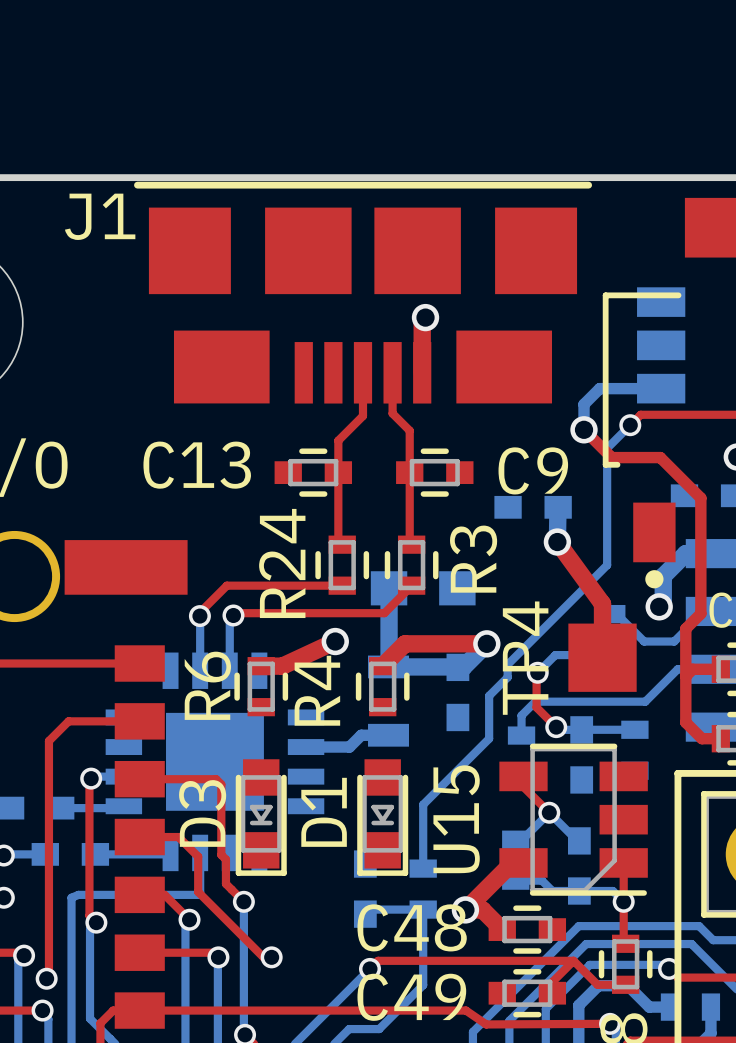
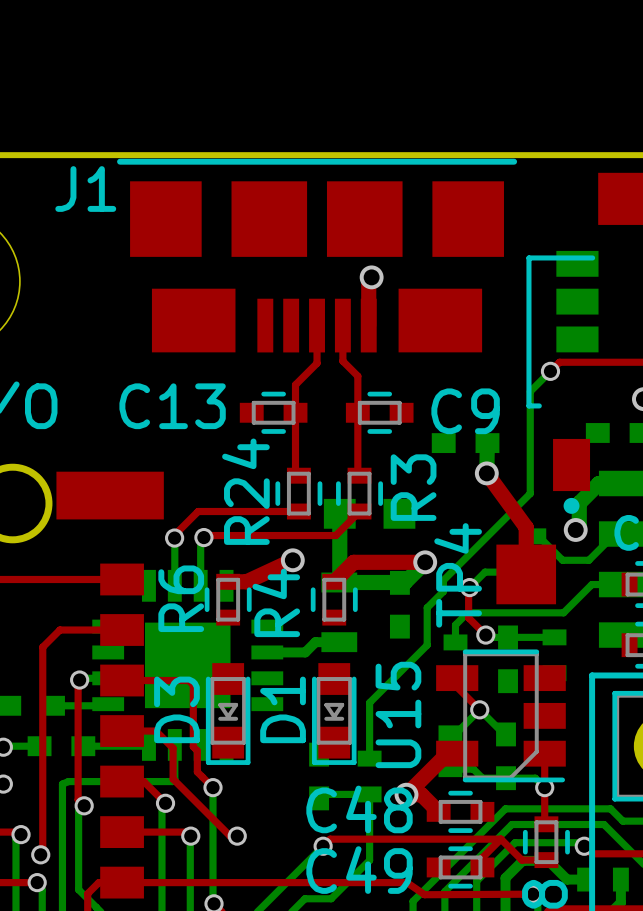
bottom track: (661, 388) (599, 388) (584, 404) (584, 429) -> none
top track: (584, 429) (611, 457) (660, 457) (700, 498) (700, 613) (685, 628) (685, 722) (702, 738) (720, 738) -> none
via: (584, 429) -> none
top track: (720, 669) (692, 669) (685, 676) -> none

